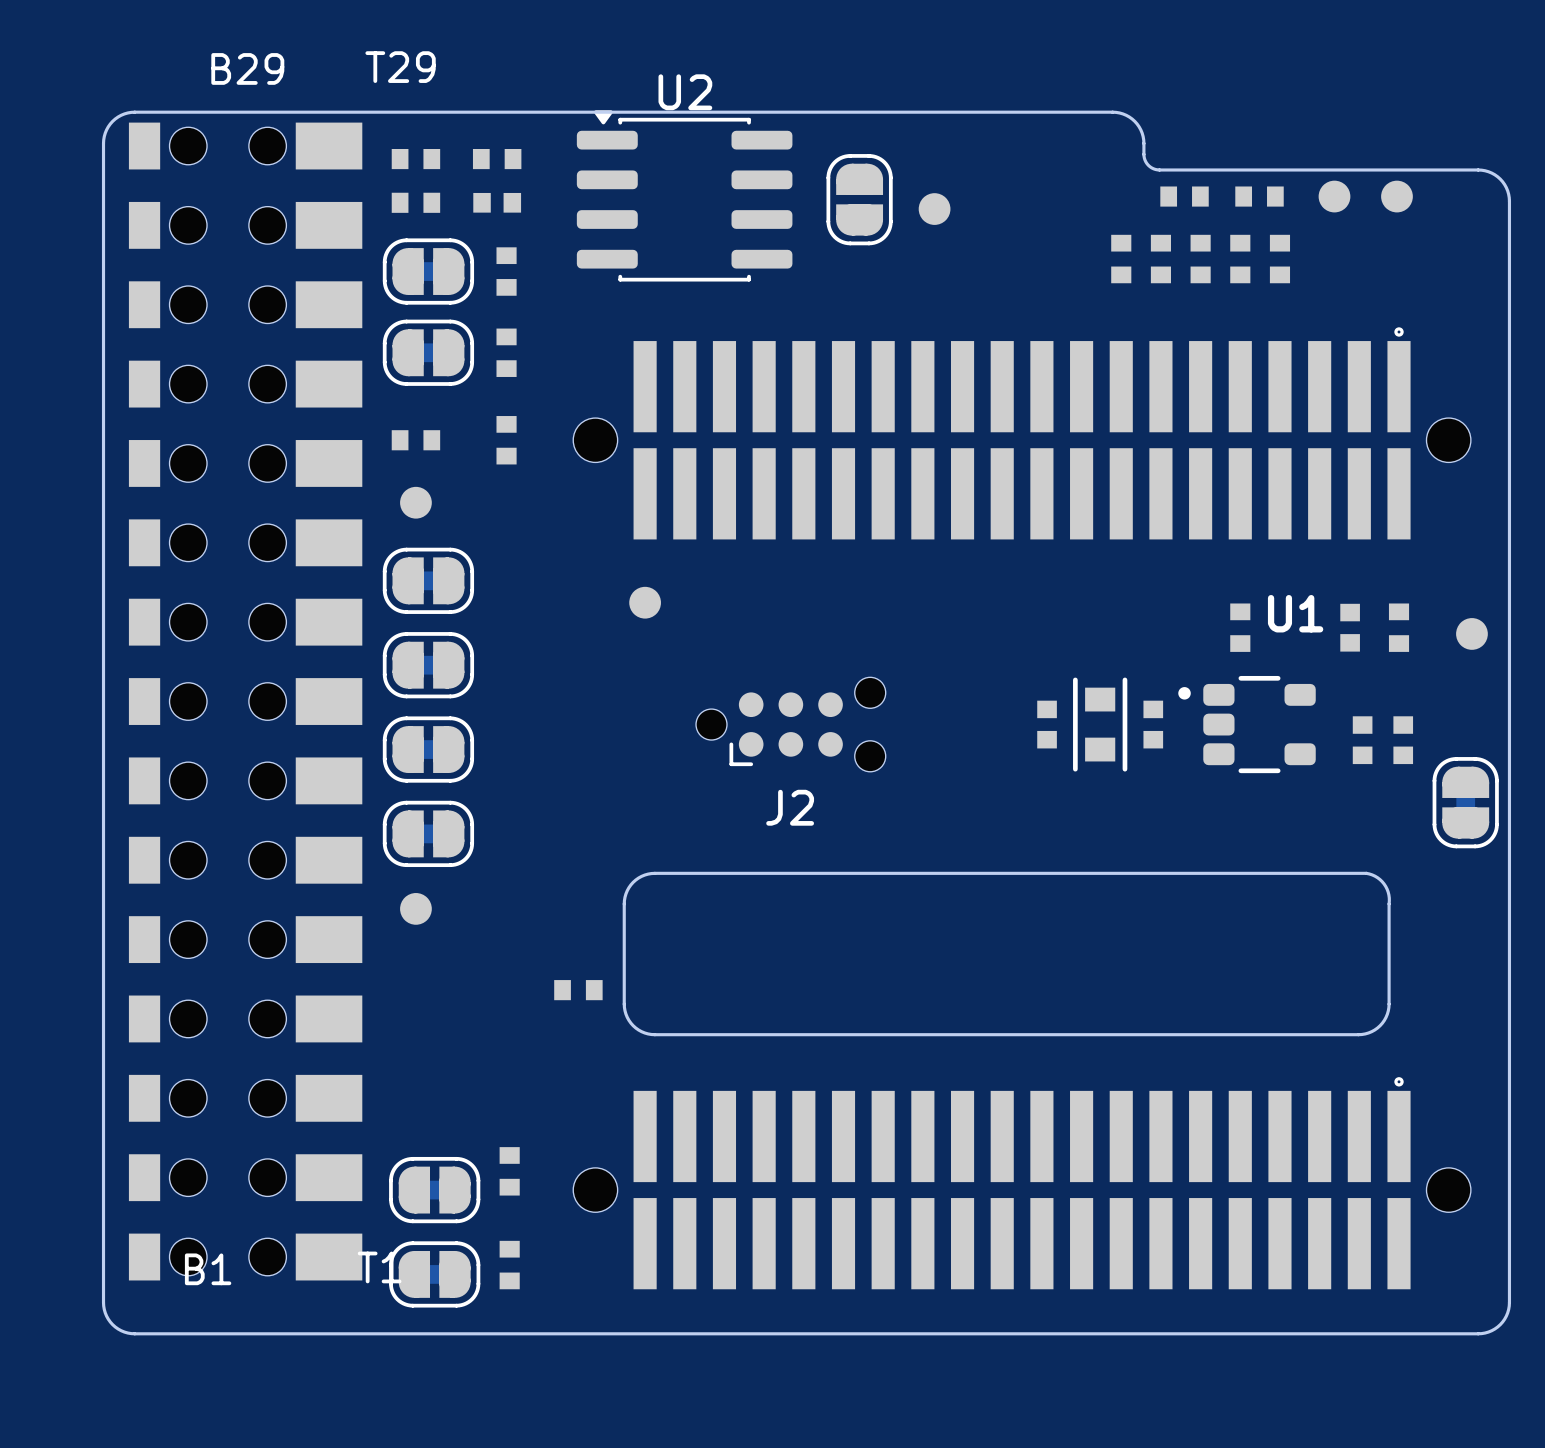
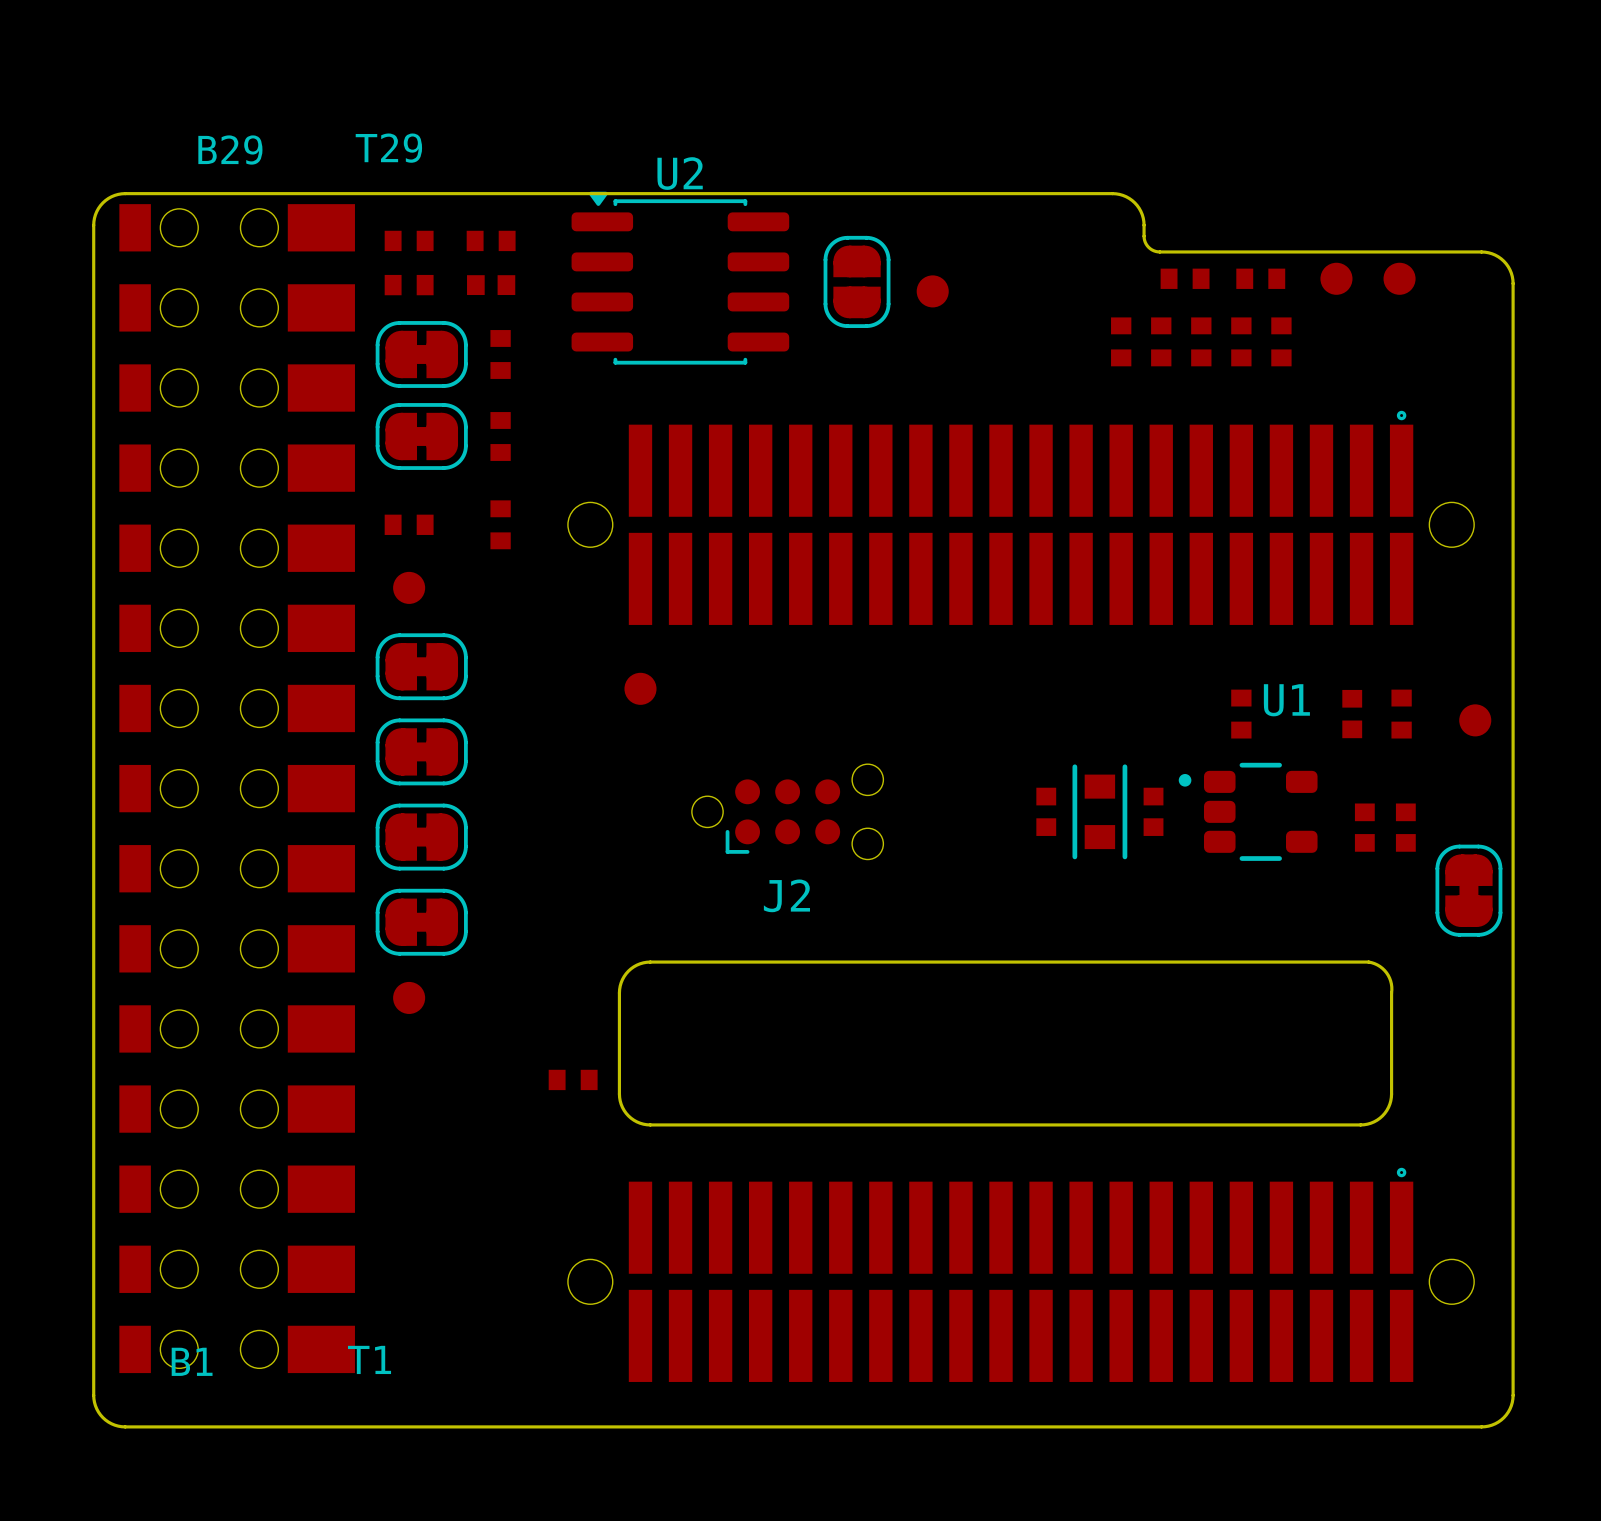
part: (509, 1171) -> none
part: (434, 1190) -> none
part: (509, 1265) -> none
part: (434, 1274) -> none

